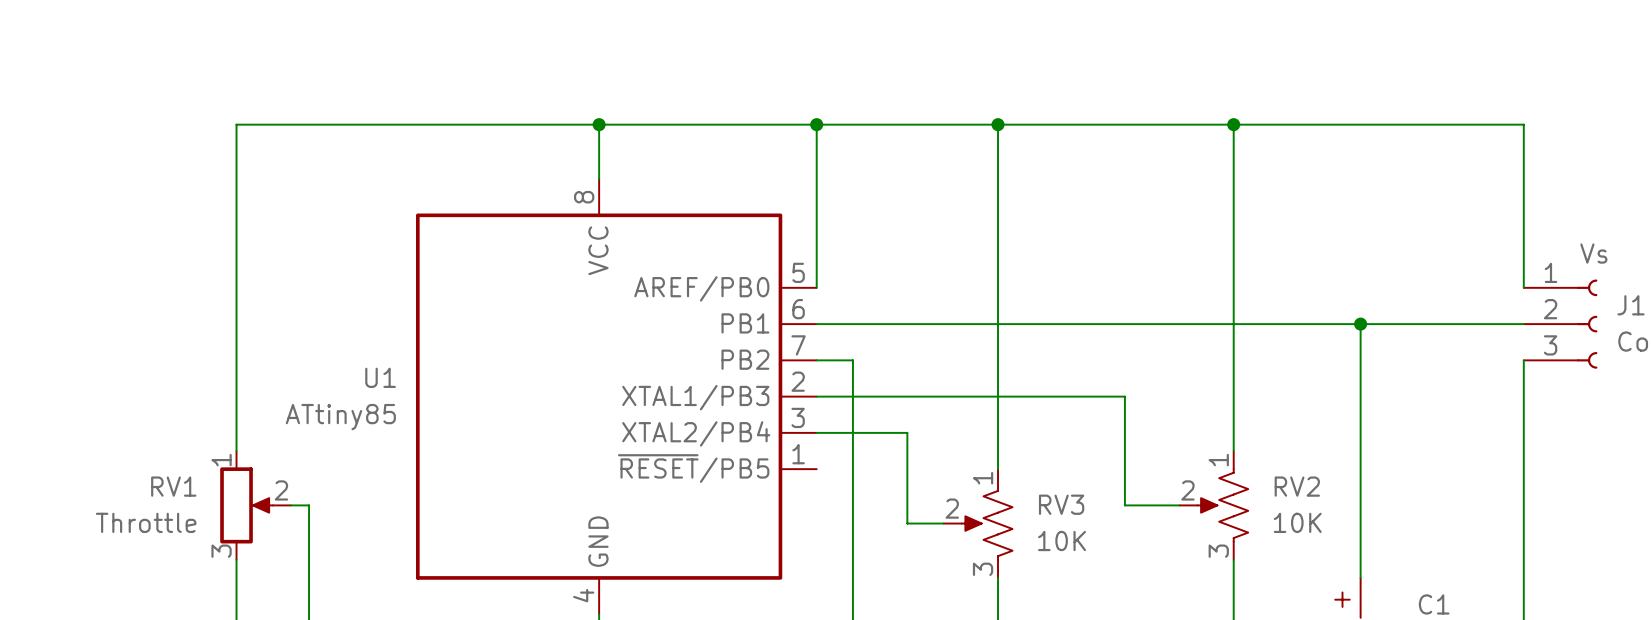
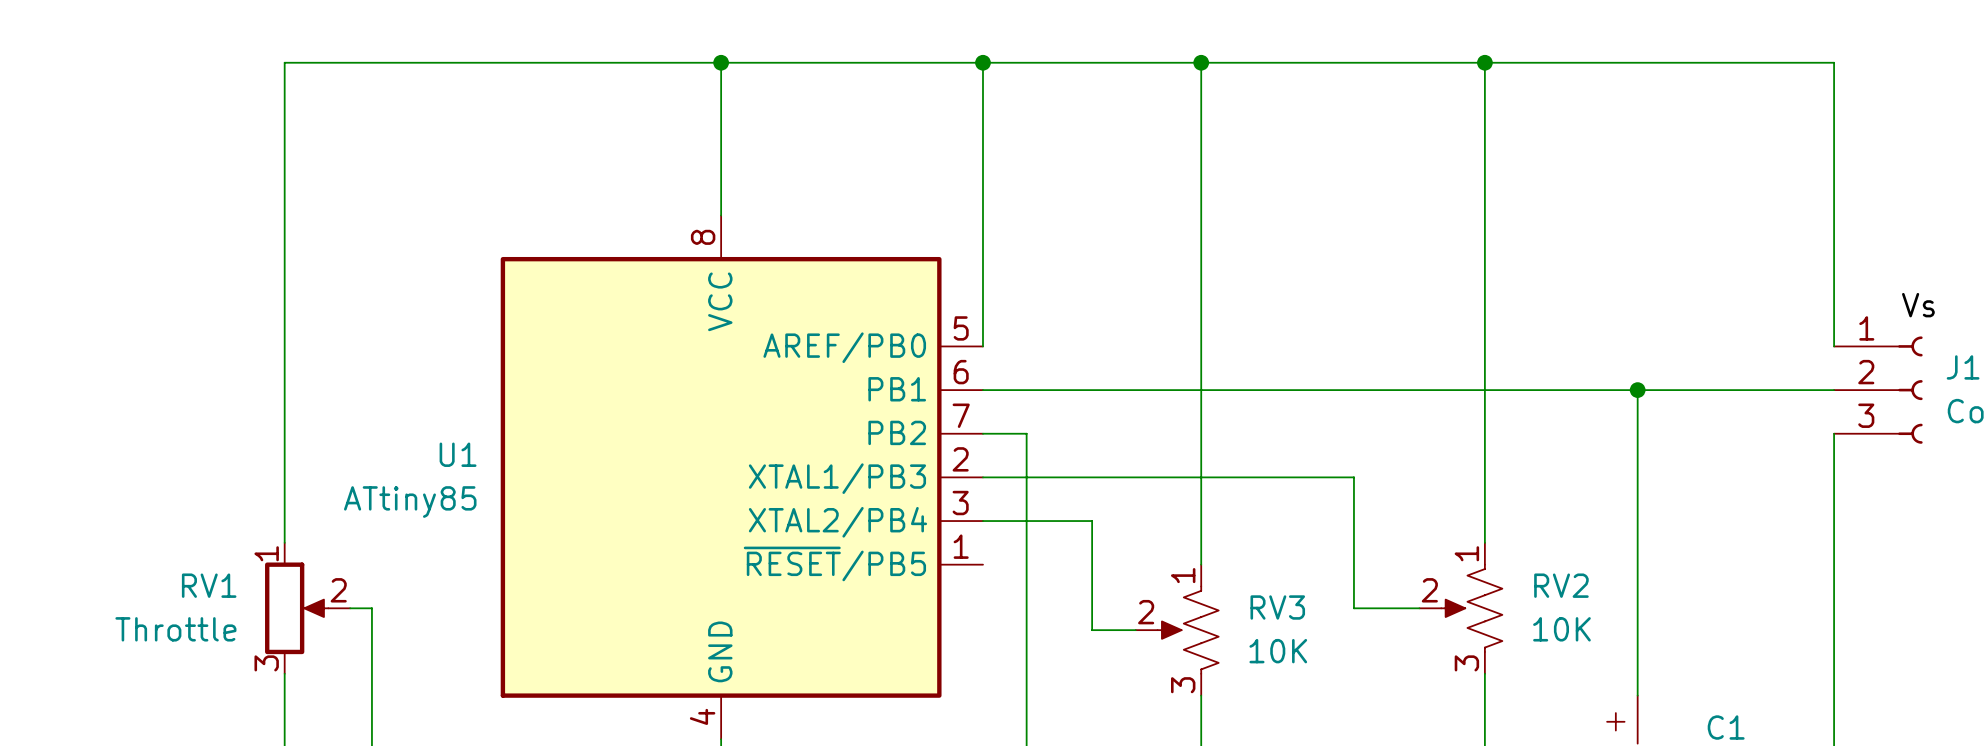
wire: none -> (721, 62) (721, 150)
wire: none -> (982, 62) (982, 150)
wire: none -> (1201, 62) (1201, 150)
wire: none -> (1484, 62) (1484, 150)
wire: (236, 124) (1523, 124) -> (284, 150) (284, 62) (1834, 62) (1834, 150)
junction position: (599, 124) -> (721, 62)
junction position: (816, 124) -> (982, 62)
junction position: (998, 124) -> (1201, 62)
junction position: (1233, 124) -> (1484, 62)

